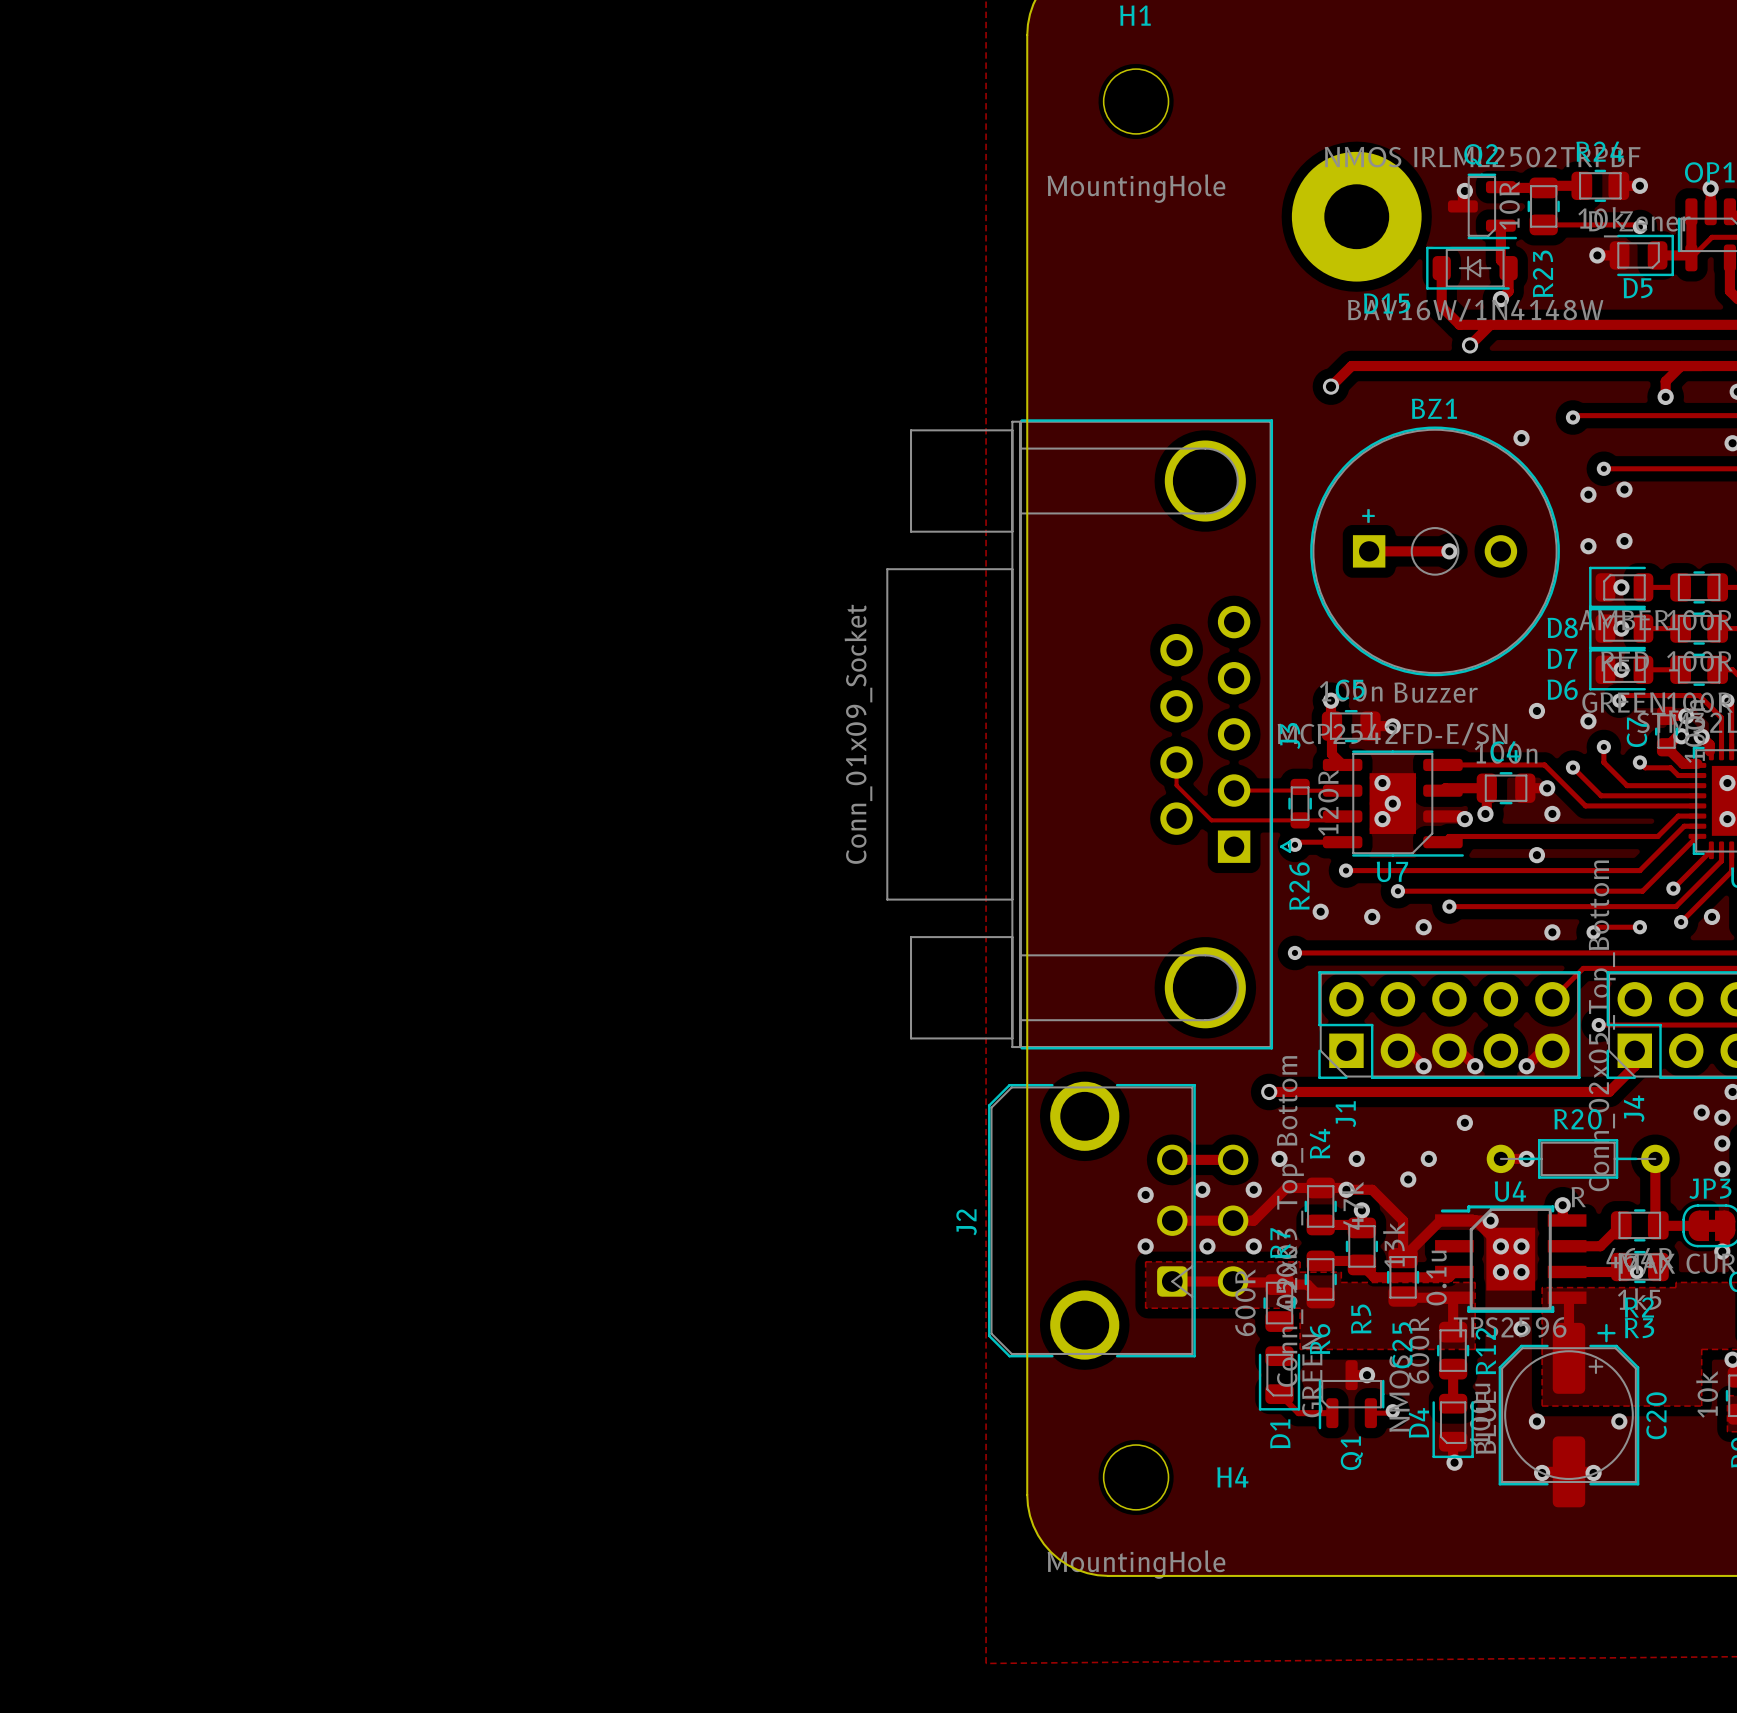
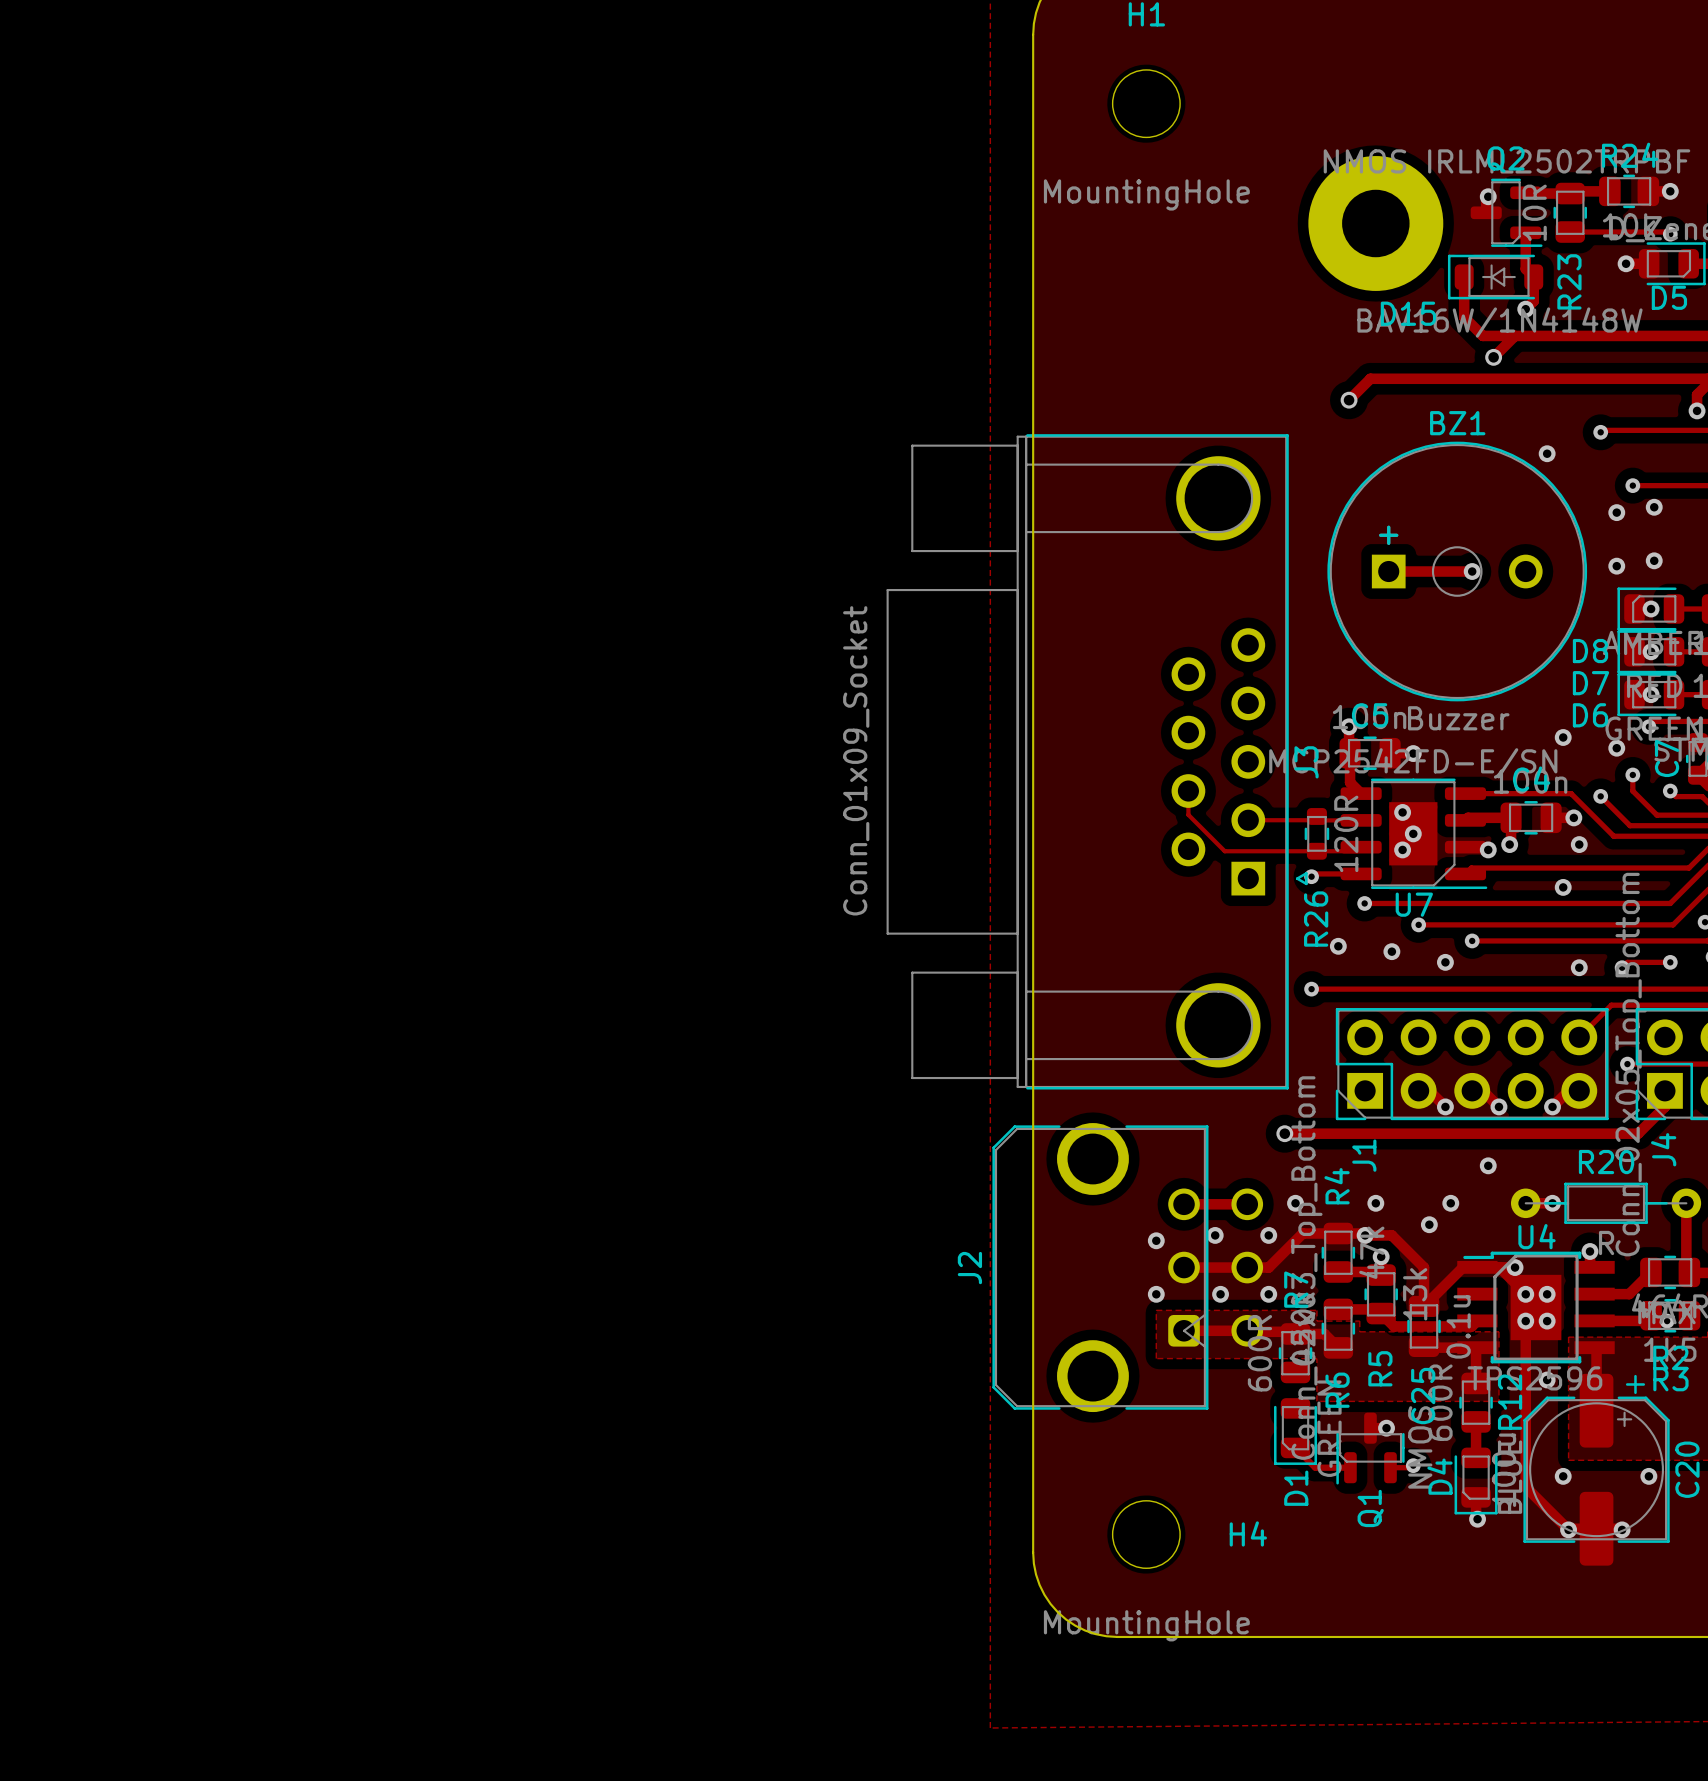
track: none -> (1525, 1321) (1525, 1487) (1568, 1529)

